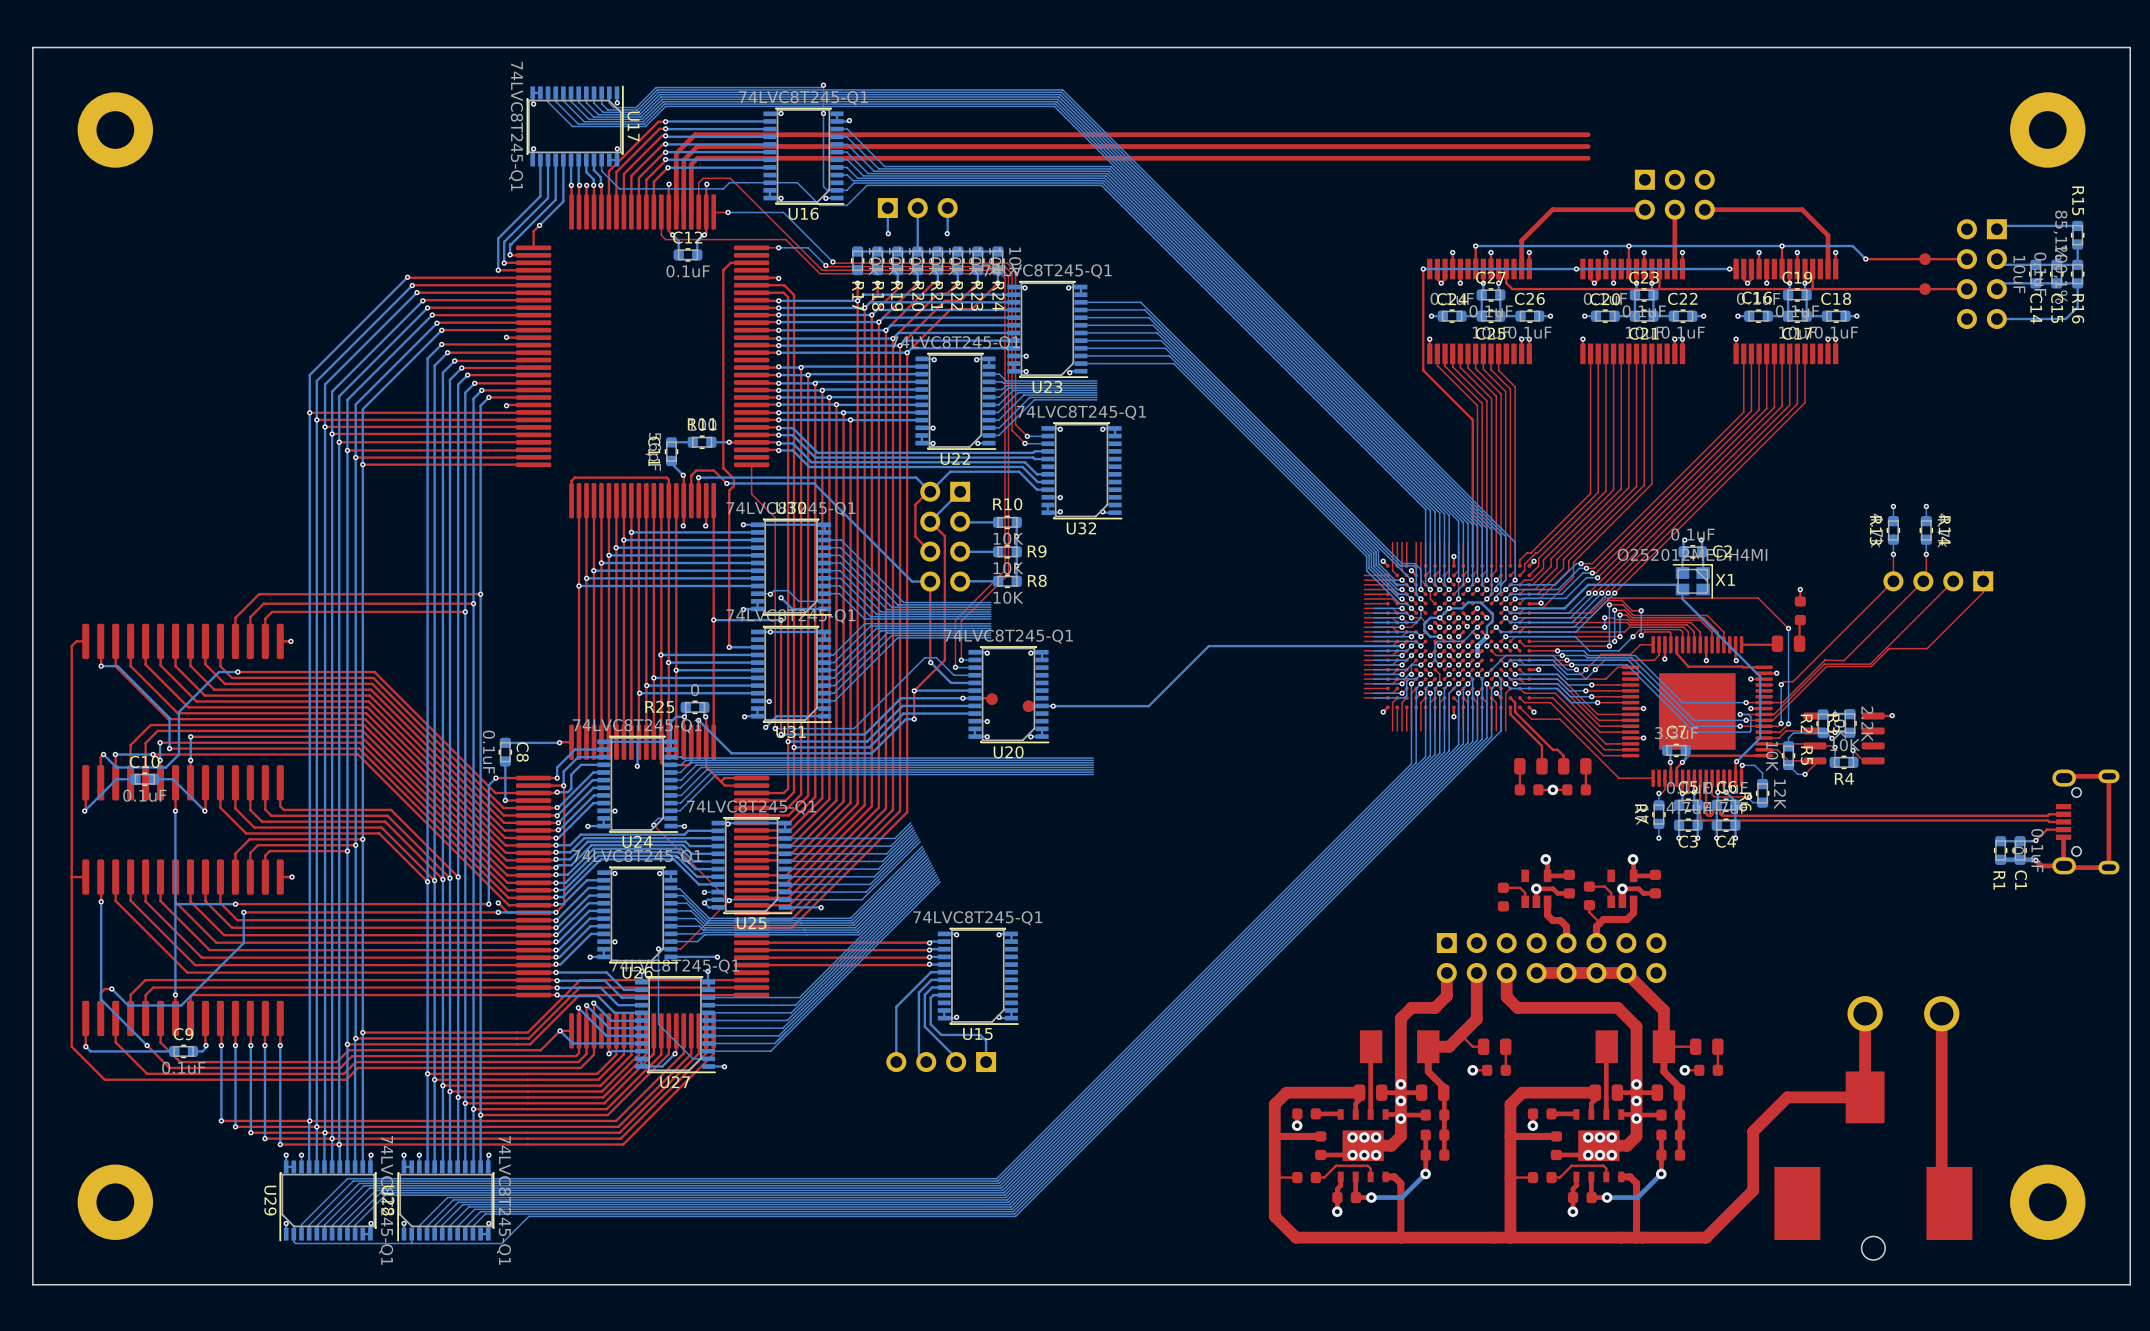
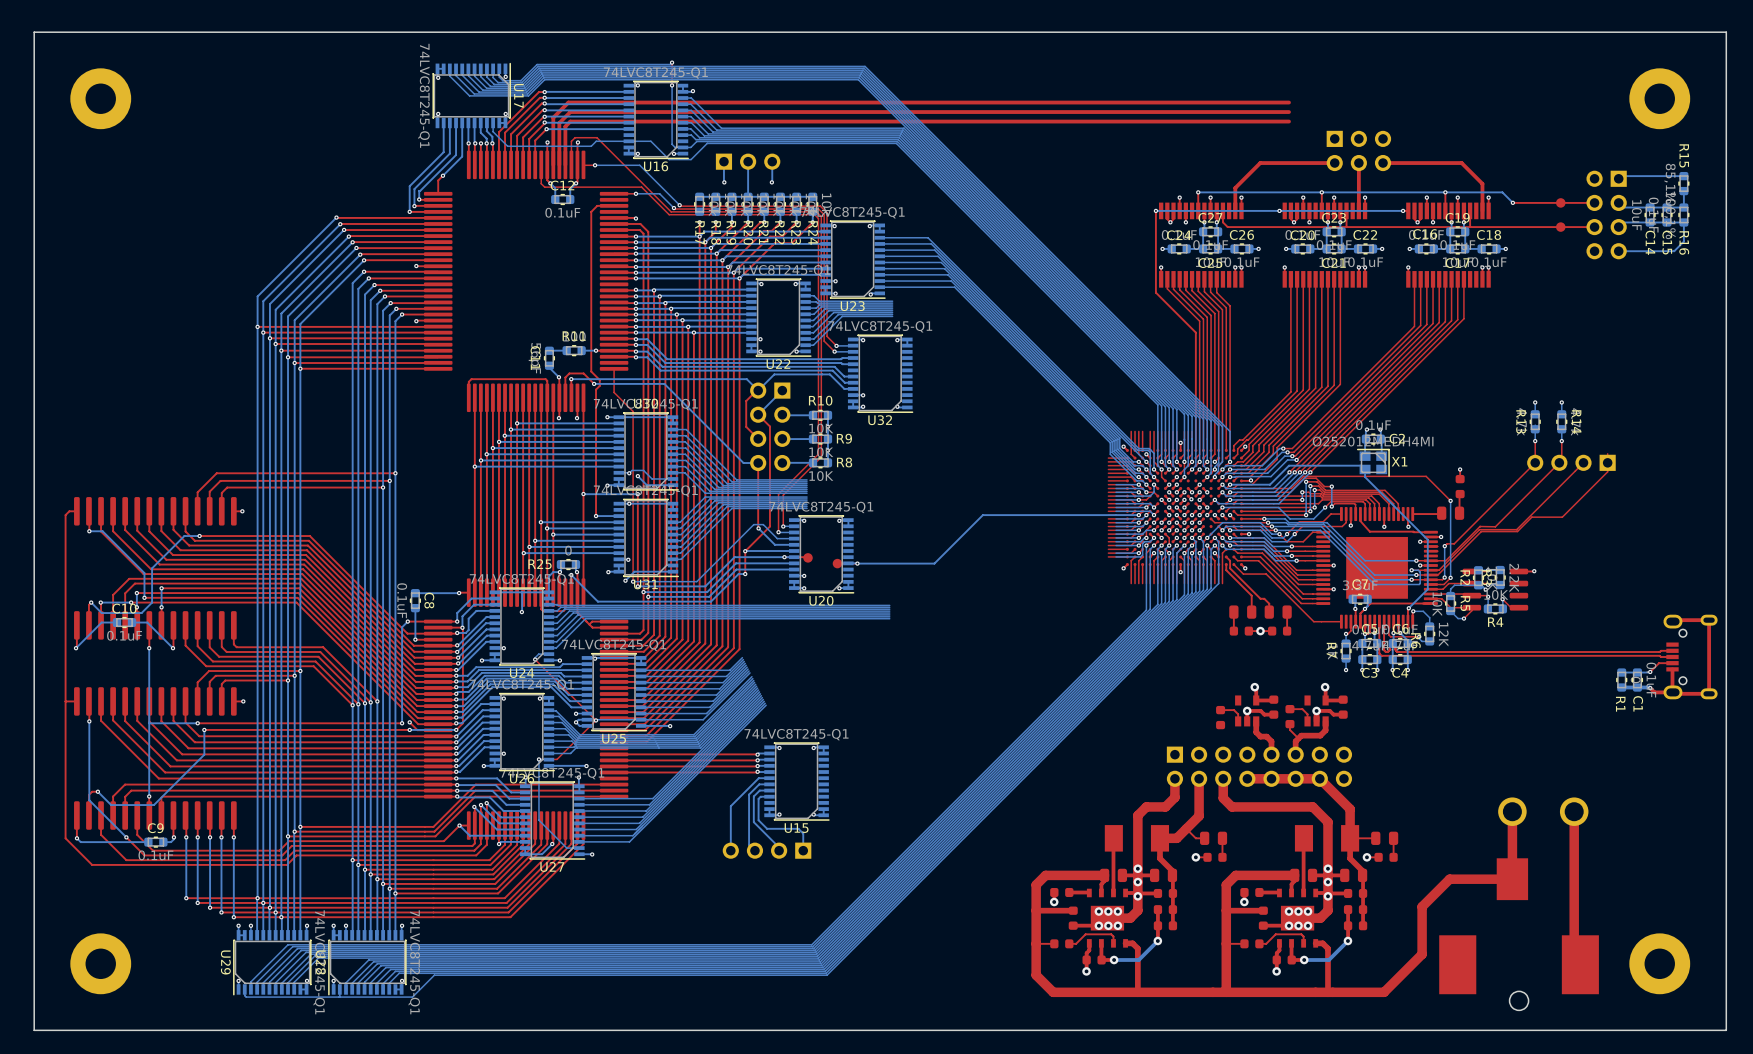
bottom track: (1477, 627) (1463, 641) (1437, 641) (1435, 643) (1435, 660) (1439, 664) -> none
bottom track: (1439, 636) (1430, 636) (1424, 630) (1424, 623) (1430, 617) (1439, 617) (1449, 608) (1462, 608) (1468, 602) (1481, 602) (1492, 614) (1492, 620) (1486, 626) (1486, 636) (1477, 646) (1477, 655) -> none

